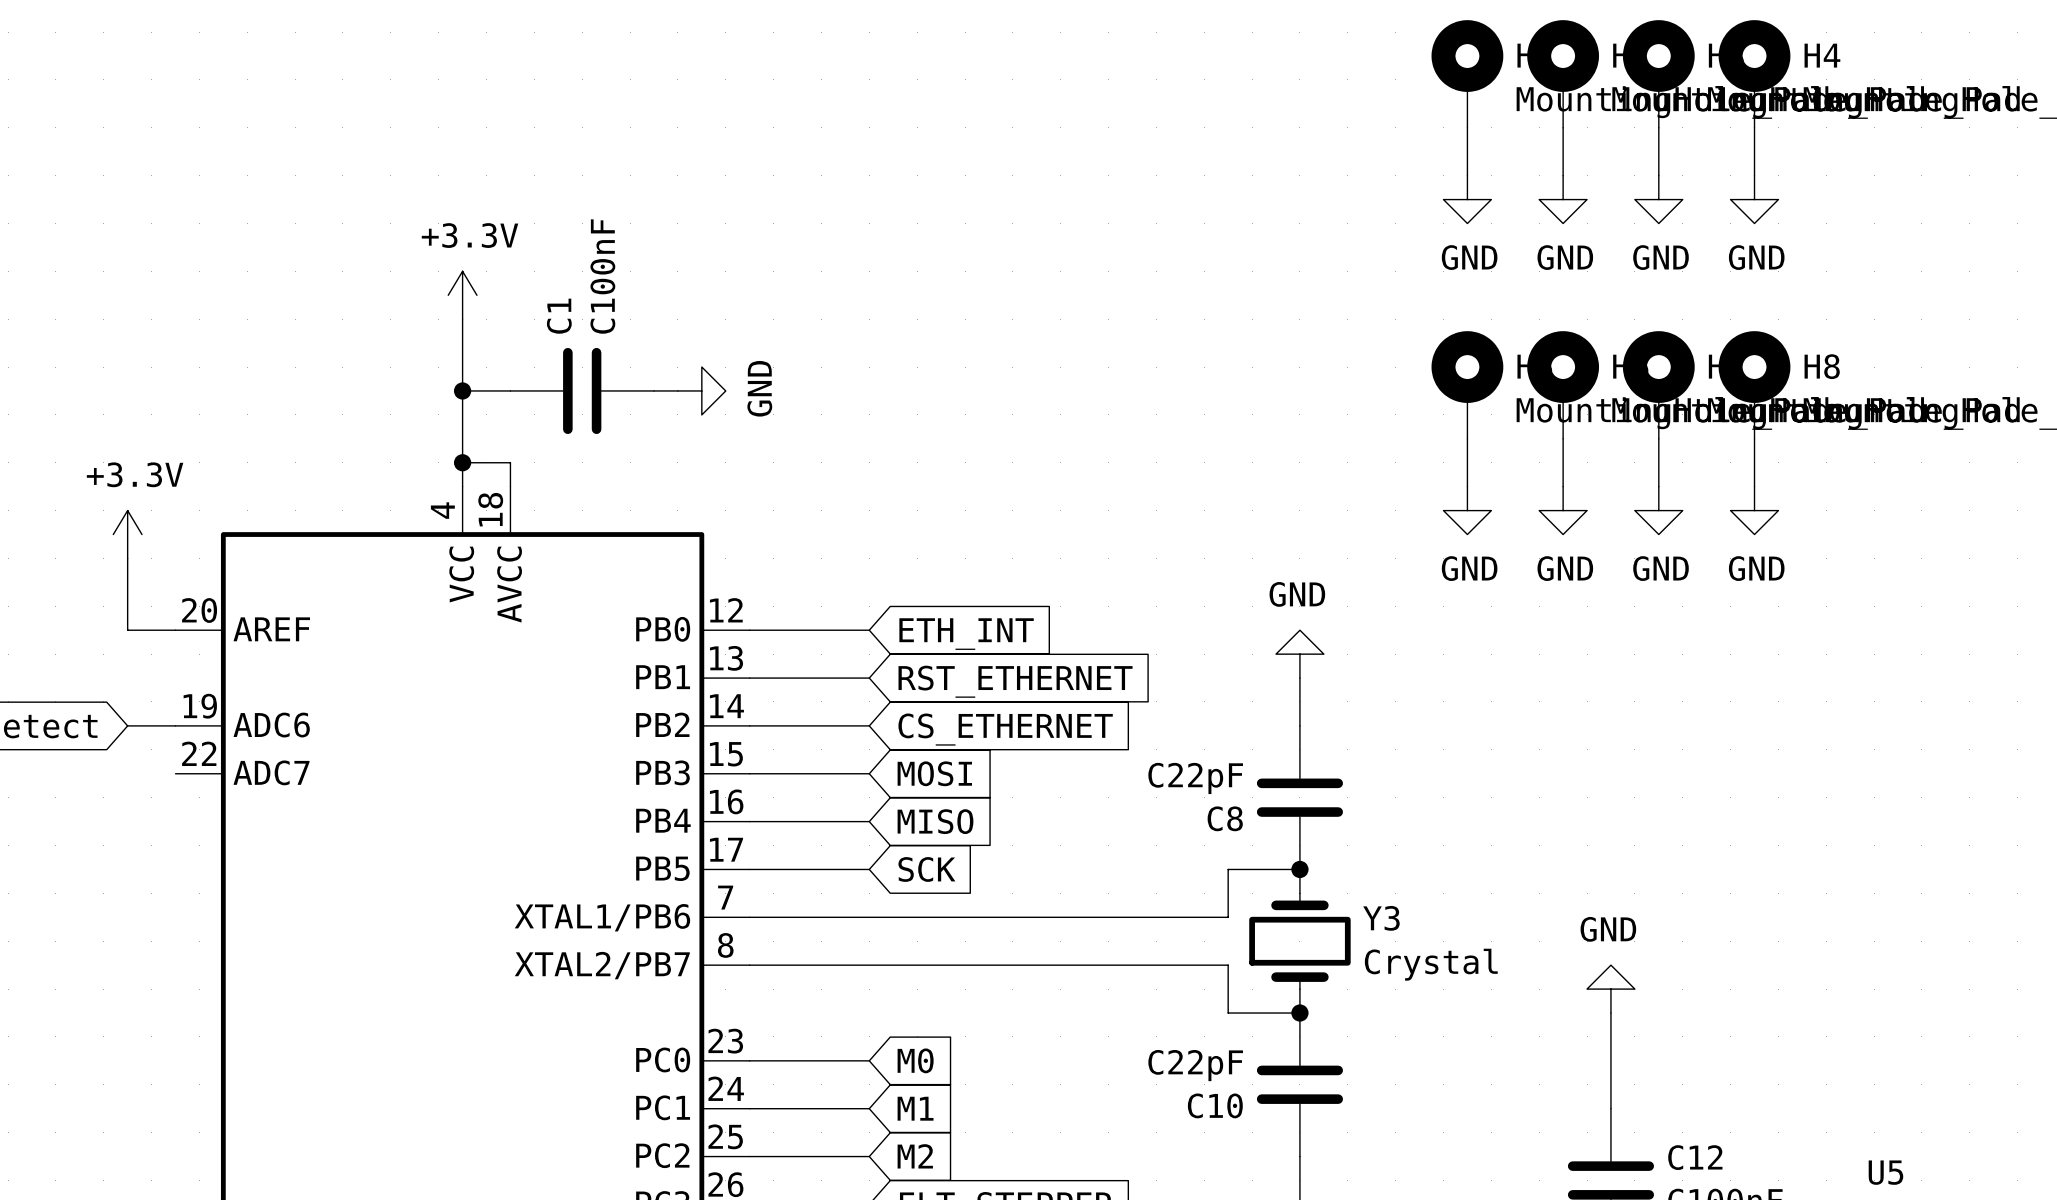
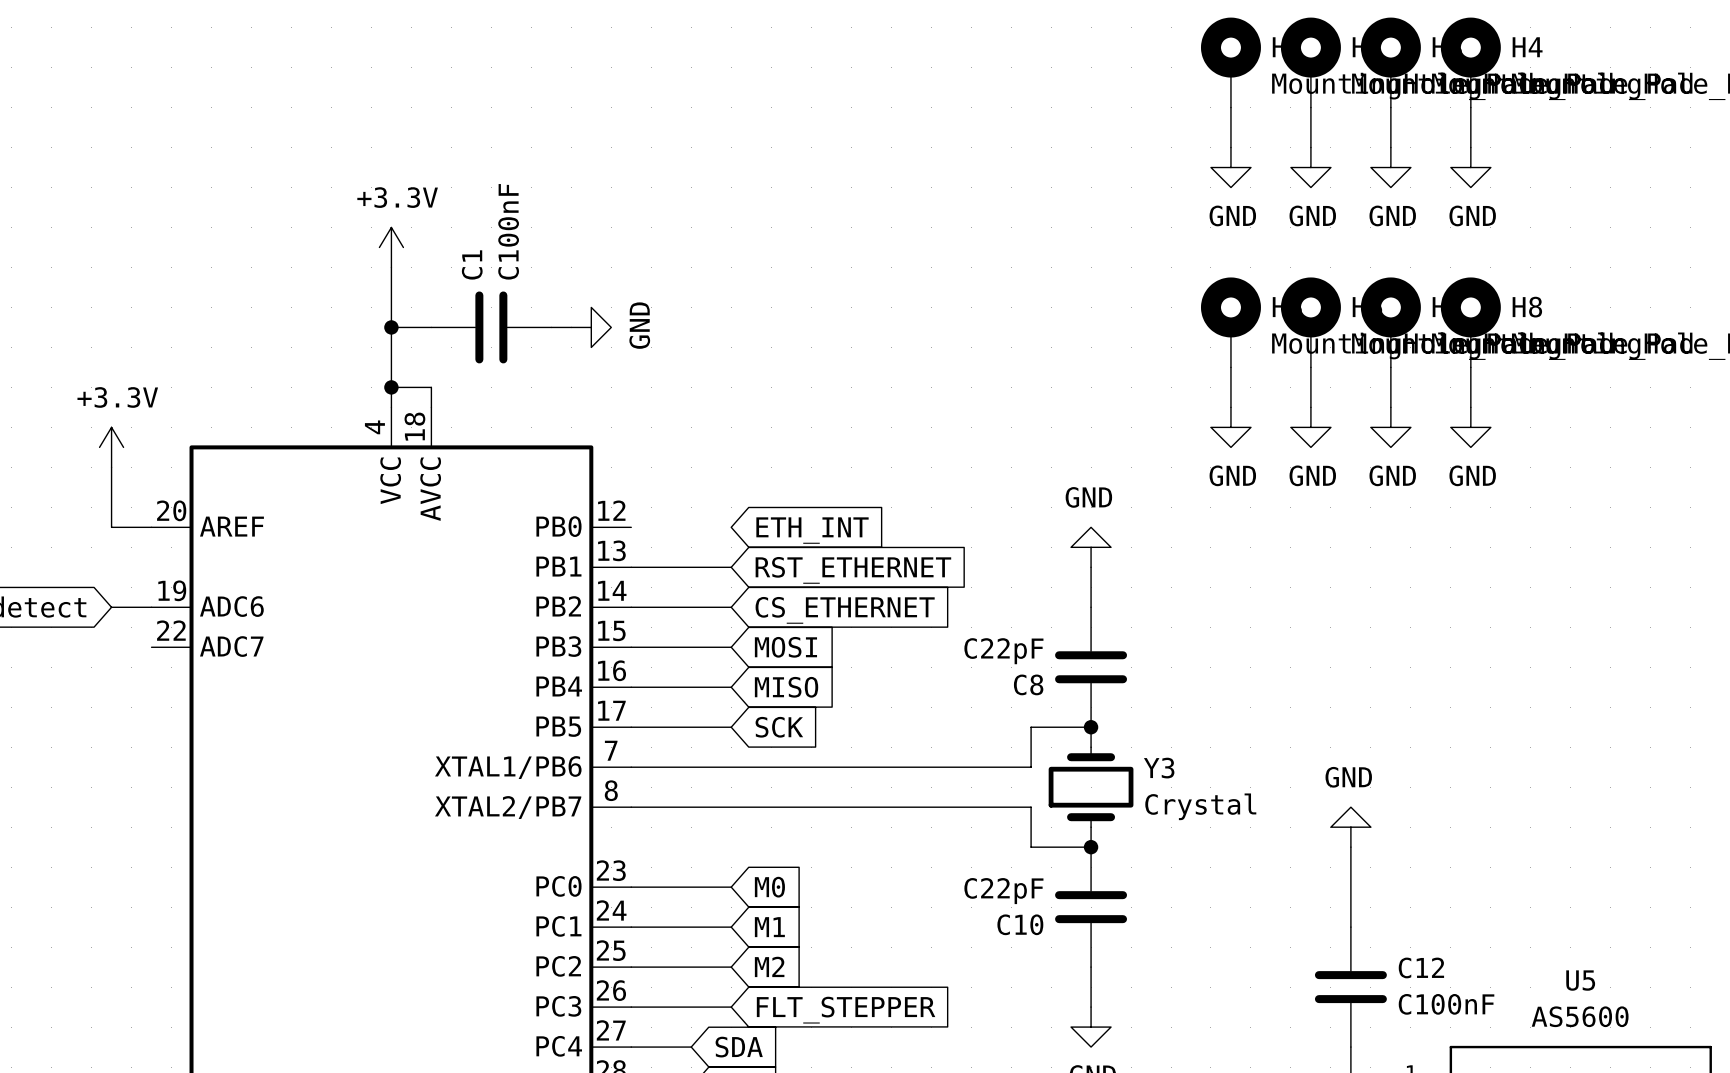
wire: (749, 630) (869, 630) -> none

